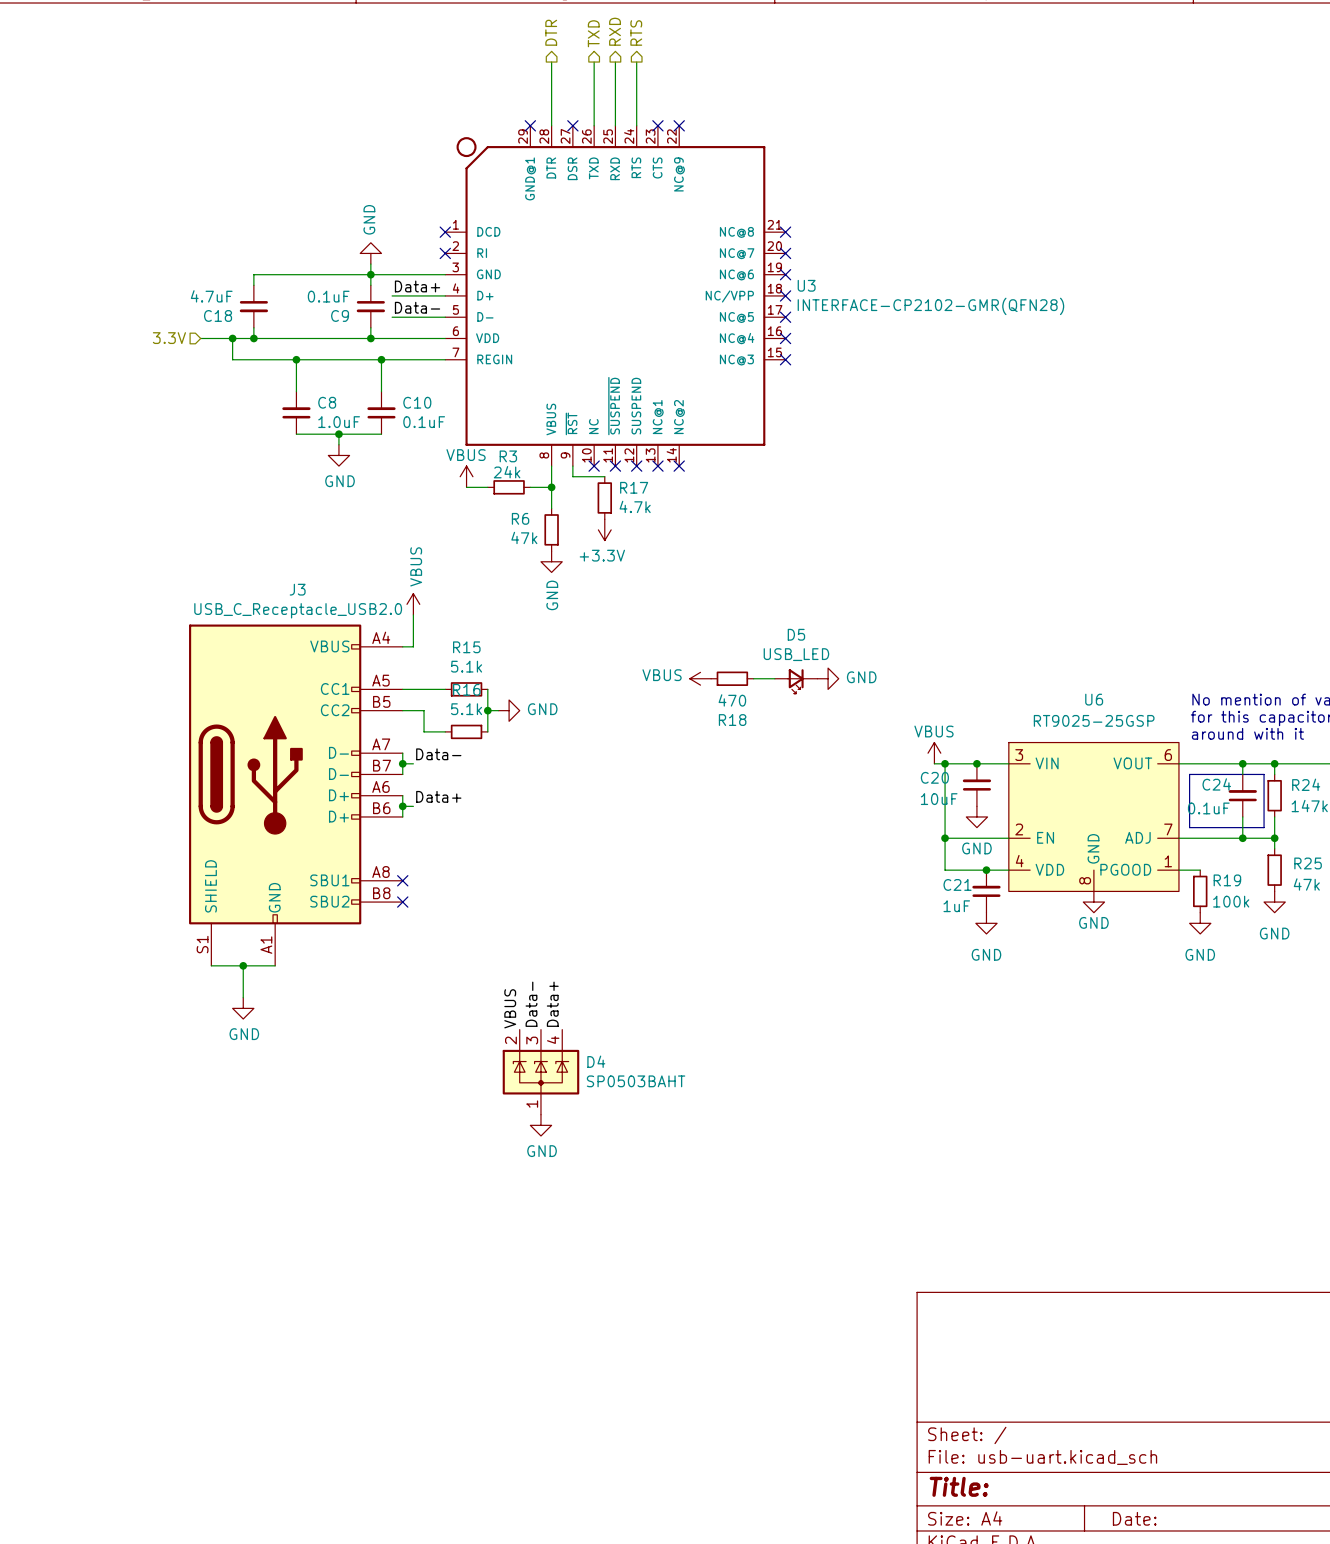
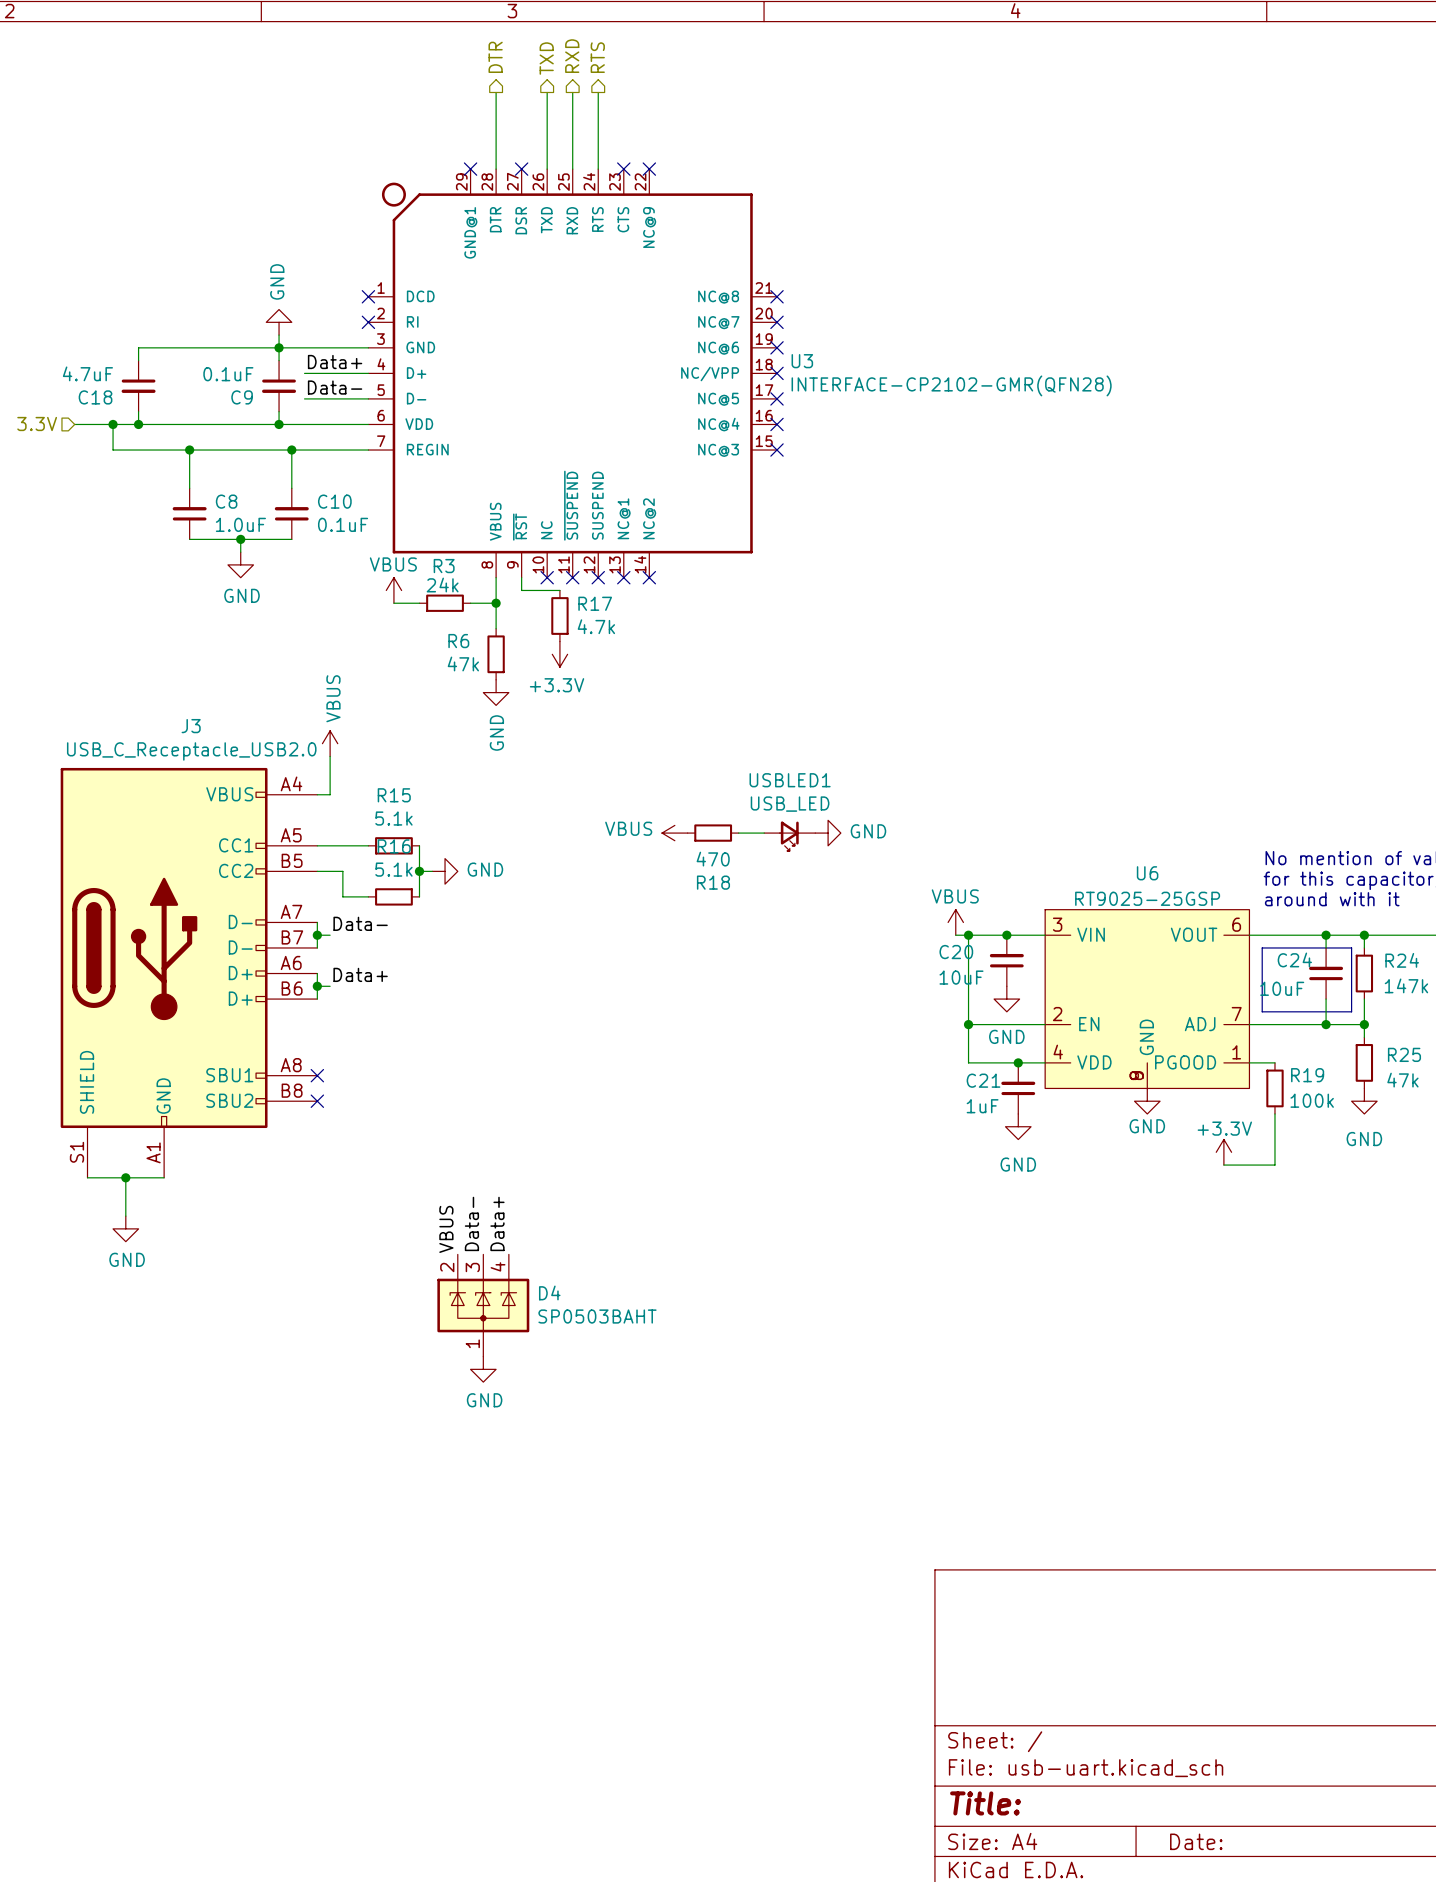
D5 name: D5 (796, 634) -> USBLED1 (790, 780)
U6 symbol: [1008, 742, 1179, 892] -> [1045, 909, 1250, 1089]
C24 value: 0.1uF (1208, 808) -> 10uF (1282, 988)
wire: none -> (1274, 1113) (1274, 1165) (1223, 1165)
power symbol: GND (1200, 923) -> none
power symbol: none -> +3.3V (1223, 1152)

